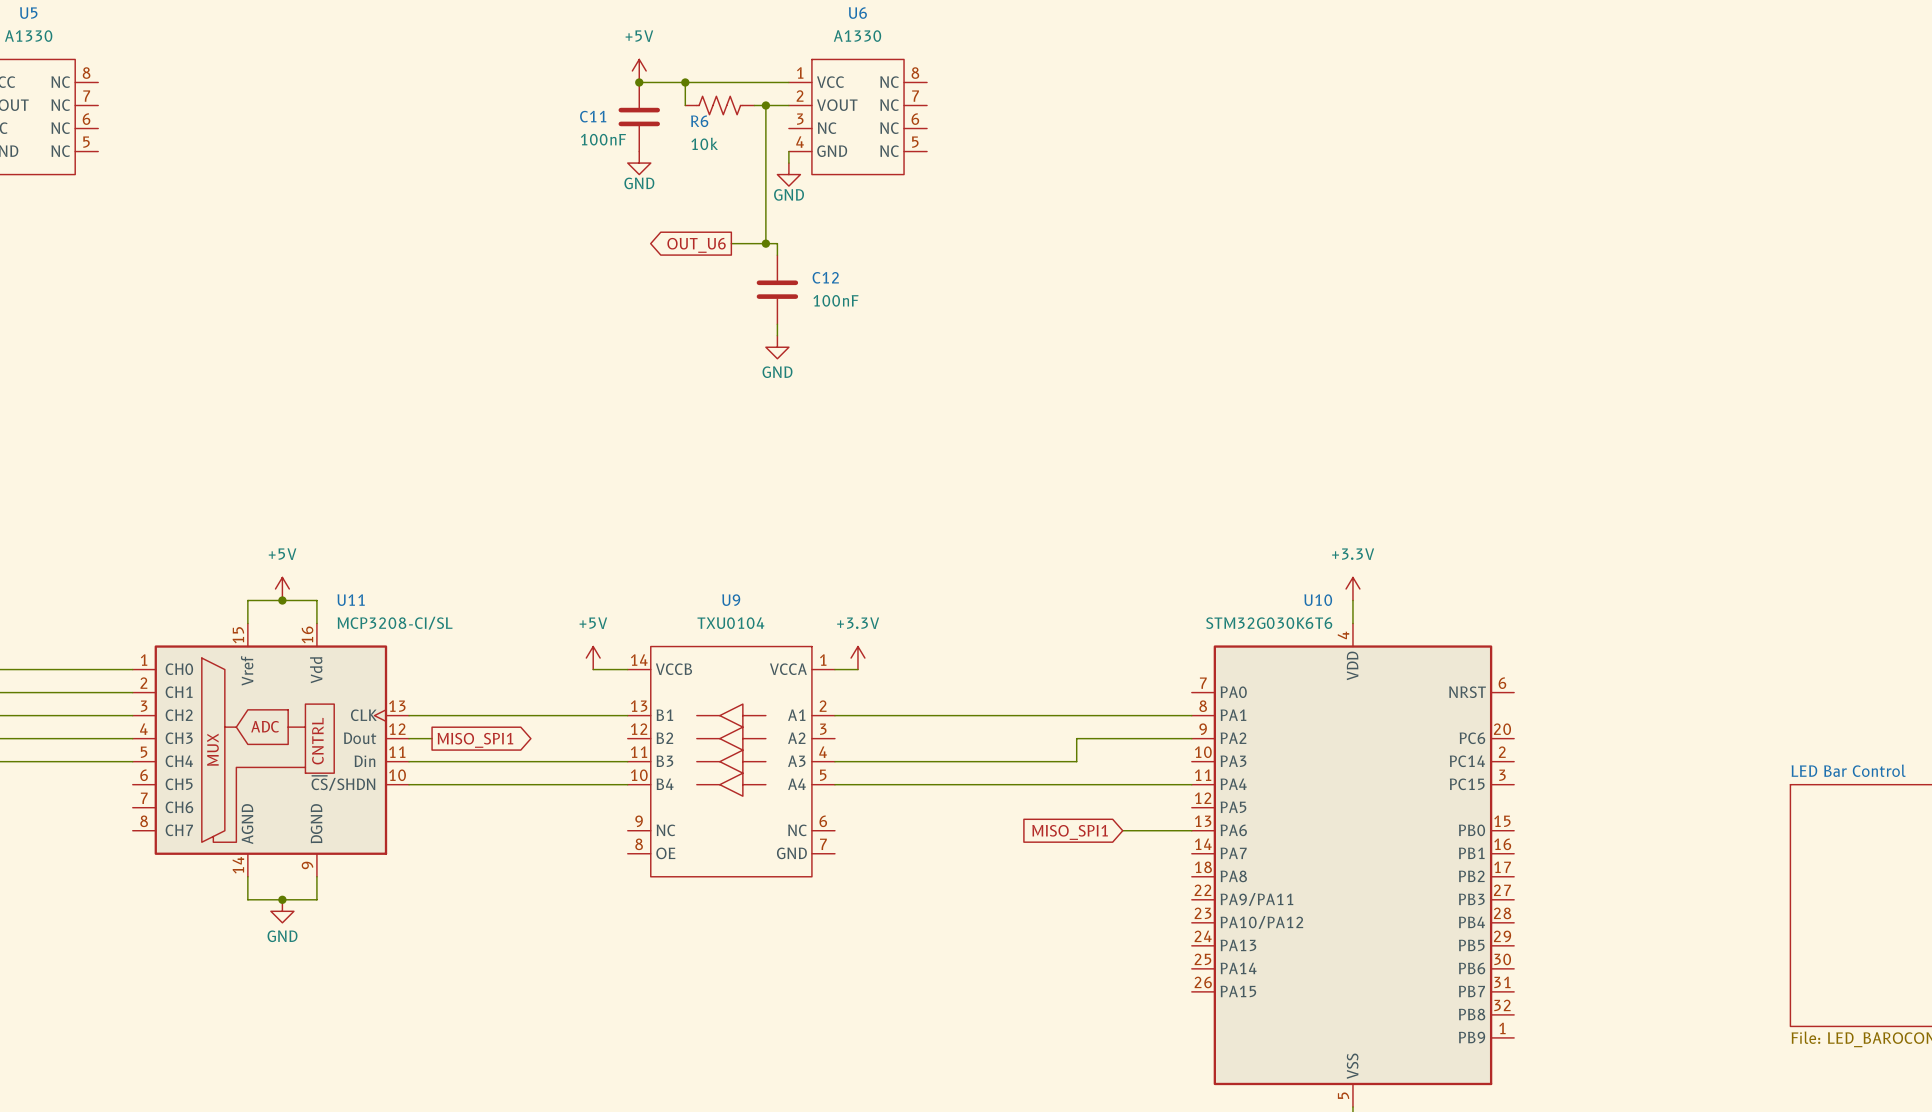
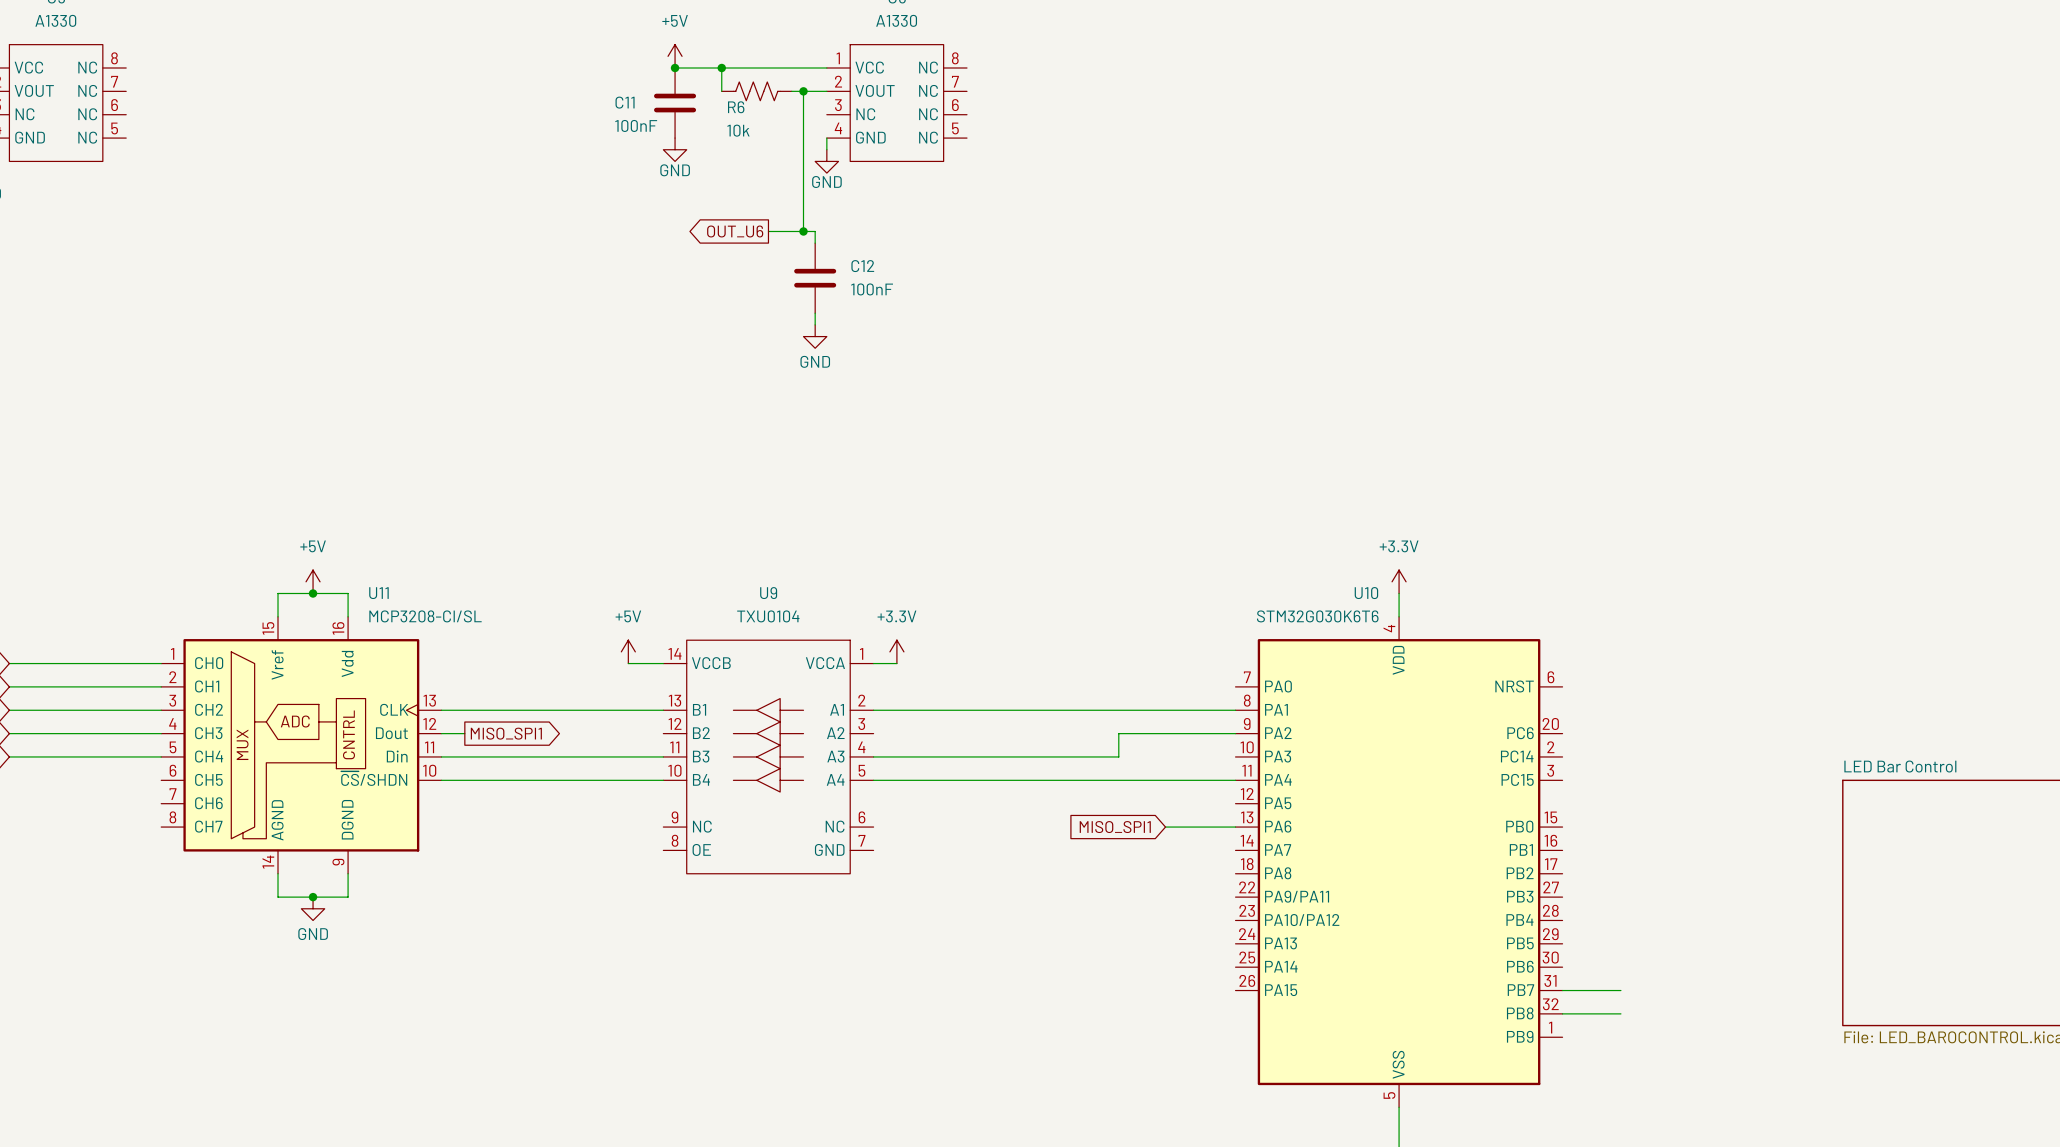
wire: none -> (1562, 990) (1620, 990)
wire: none -> (1562, 1013) (1620, 1013)

